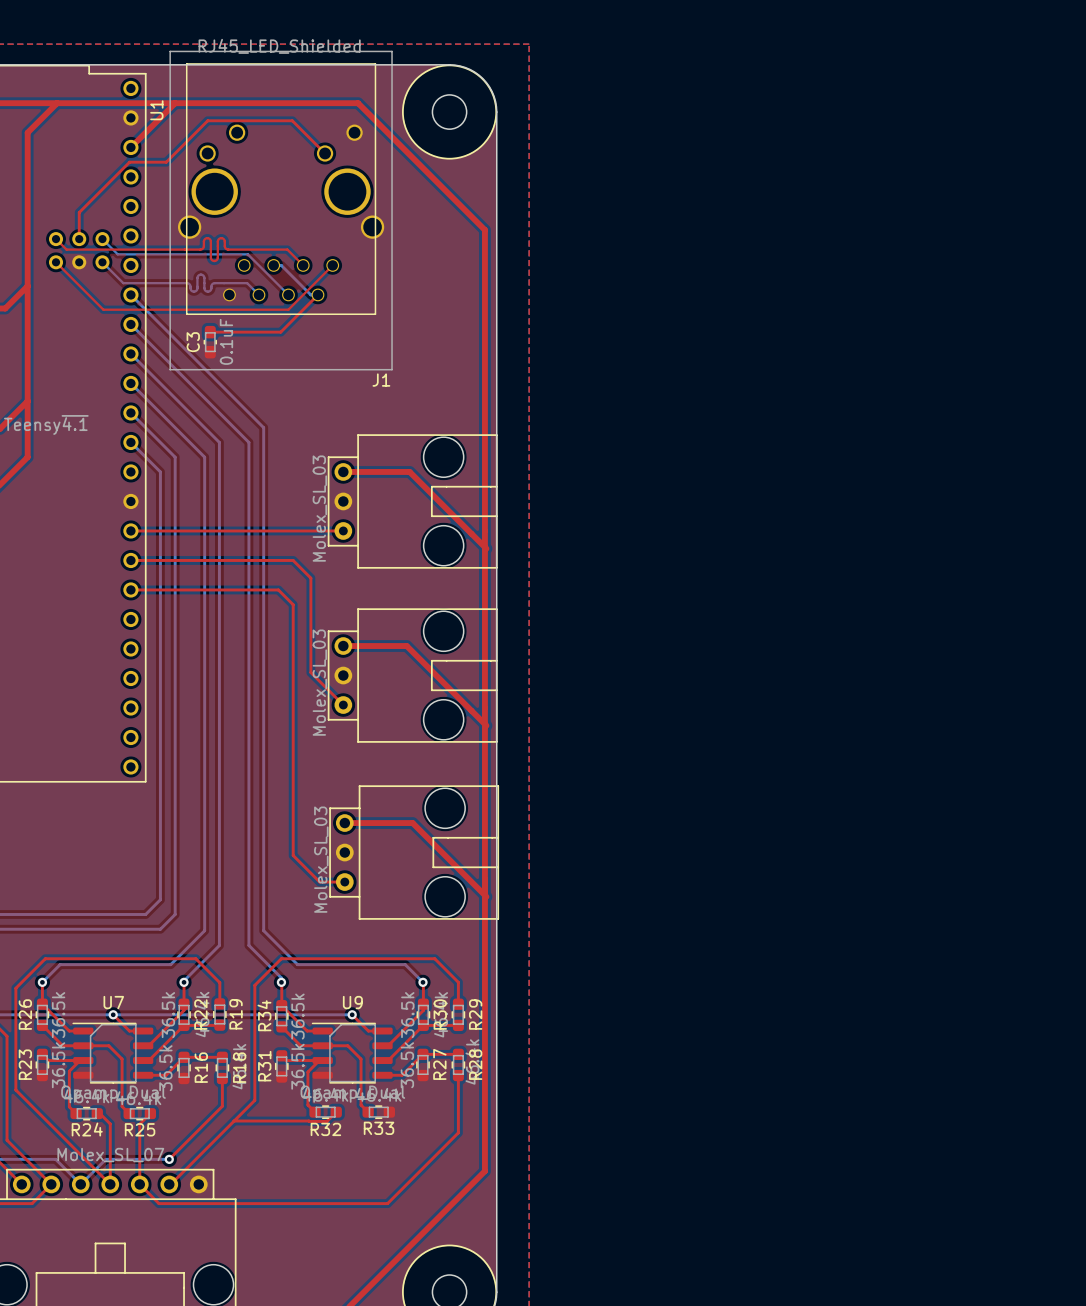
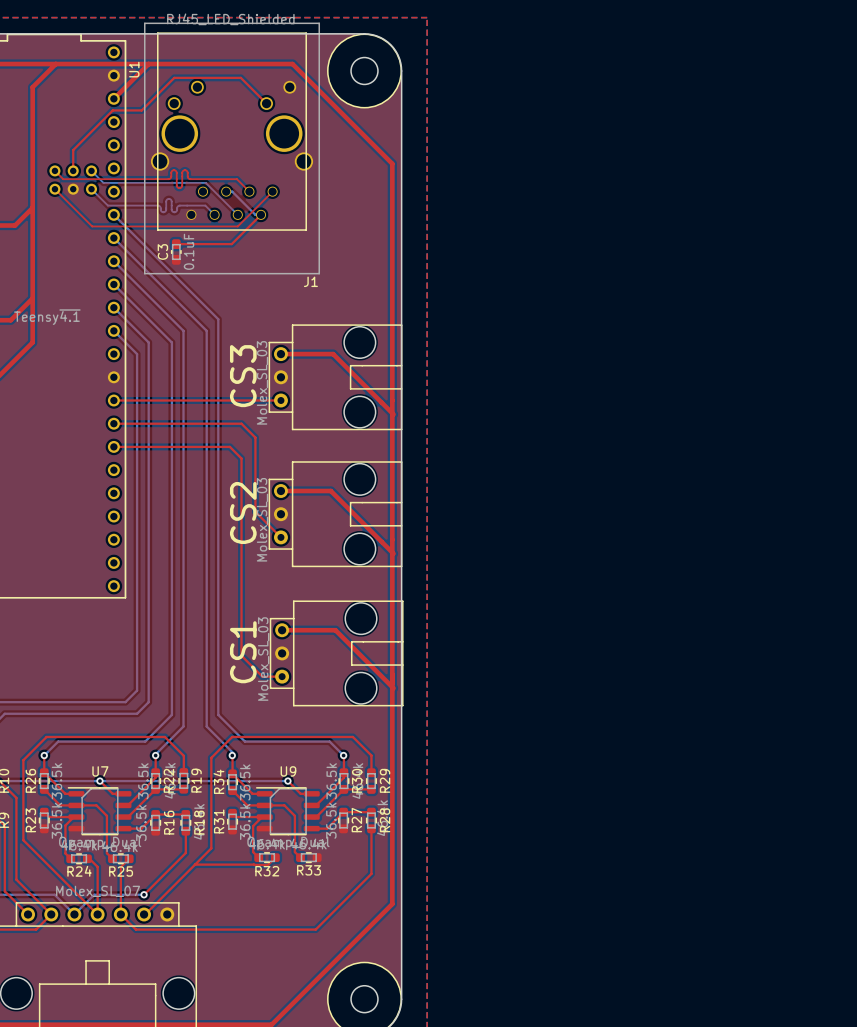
text: none -> CS3 (243, 376)
text: none -> CS2 (243, 513)
text: none -> CS1 (243, 652)

